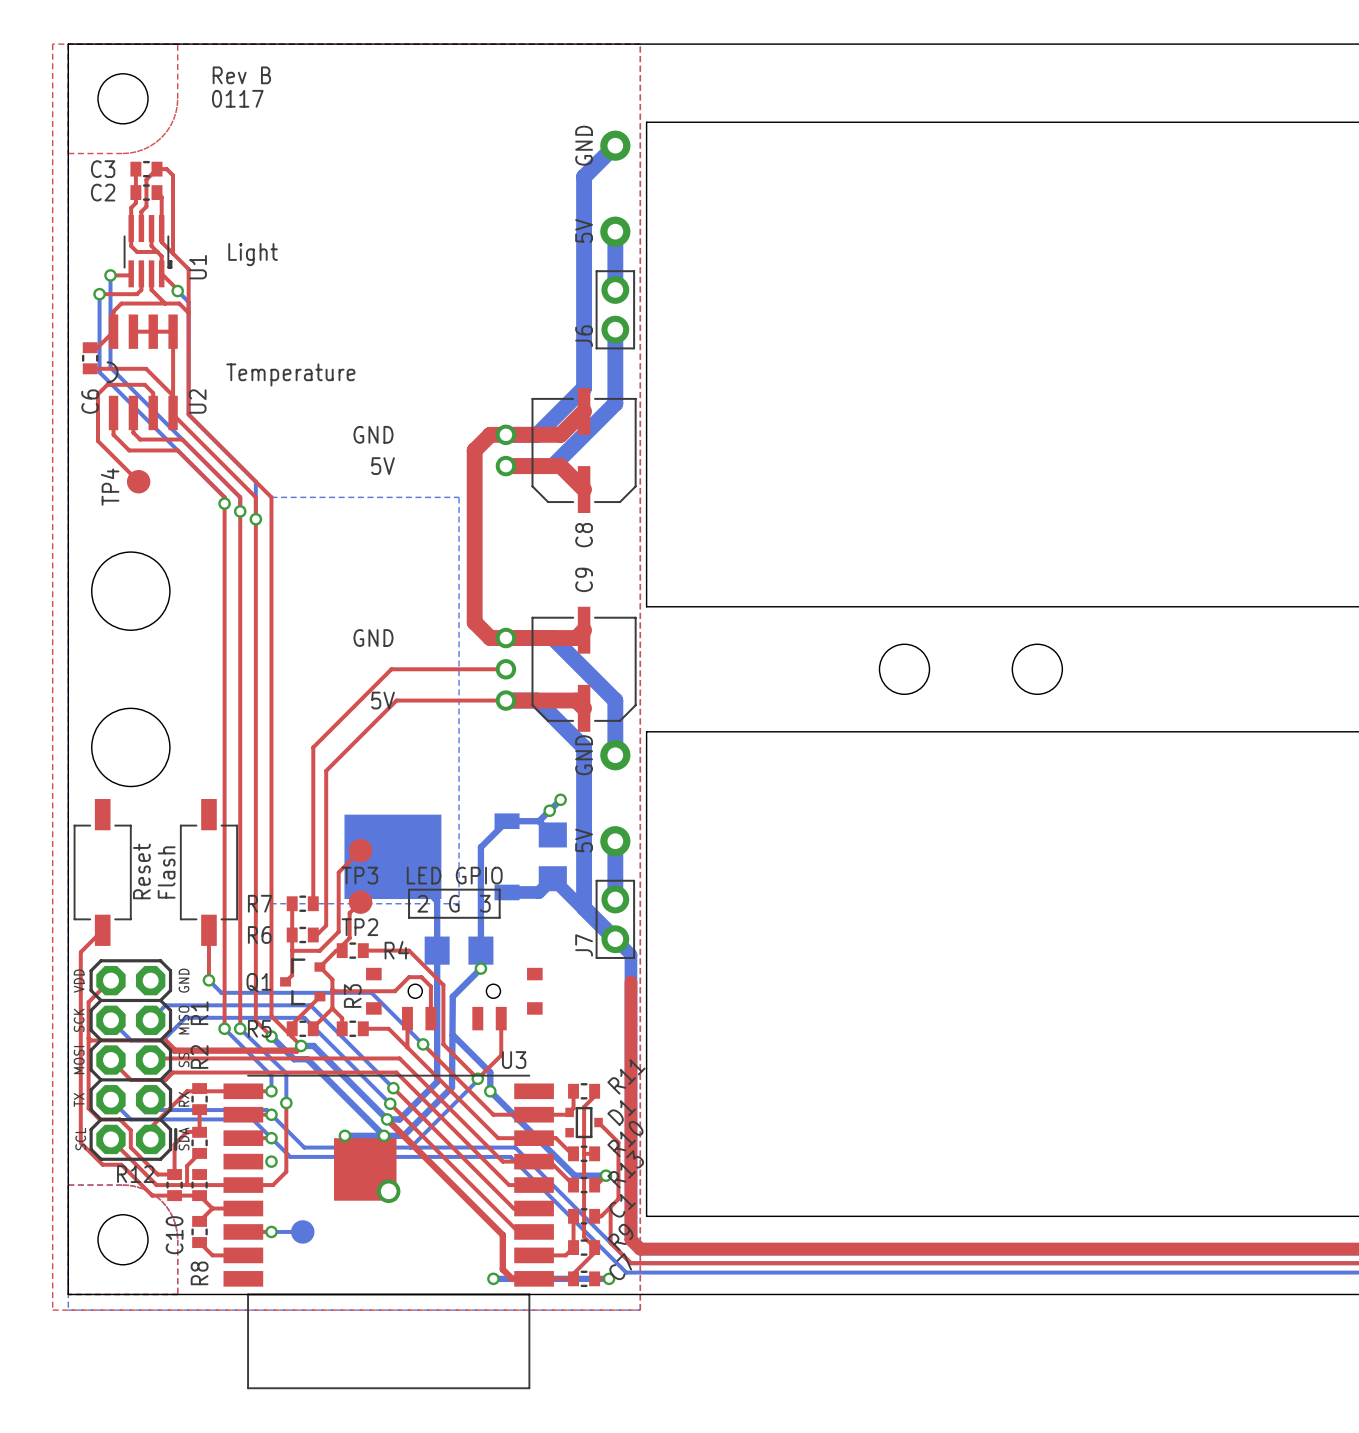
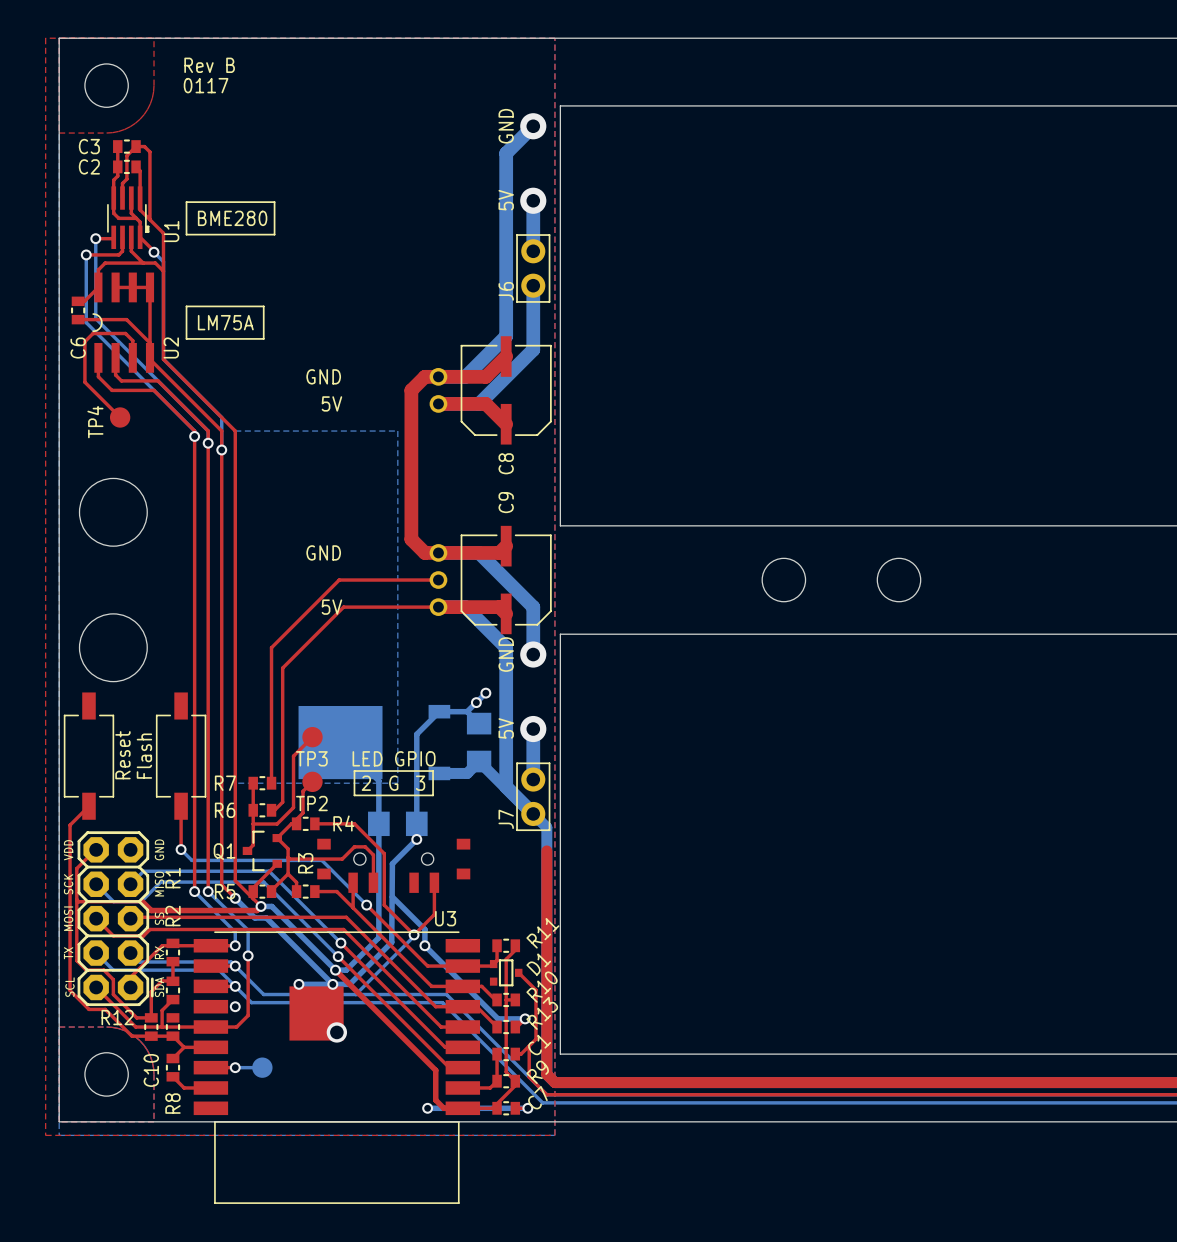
line: none -> (186, 202) (186, 234) (274, 234) (274, 202) (186, 202)
text: Light (253, 254) -> BME280 (232, 218)
line: none -> (186, 306) (263, 306) (263, 338) (186, 338) (186, 306)
text: Temperature (290, 374) -> LM75A (225, 322)

